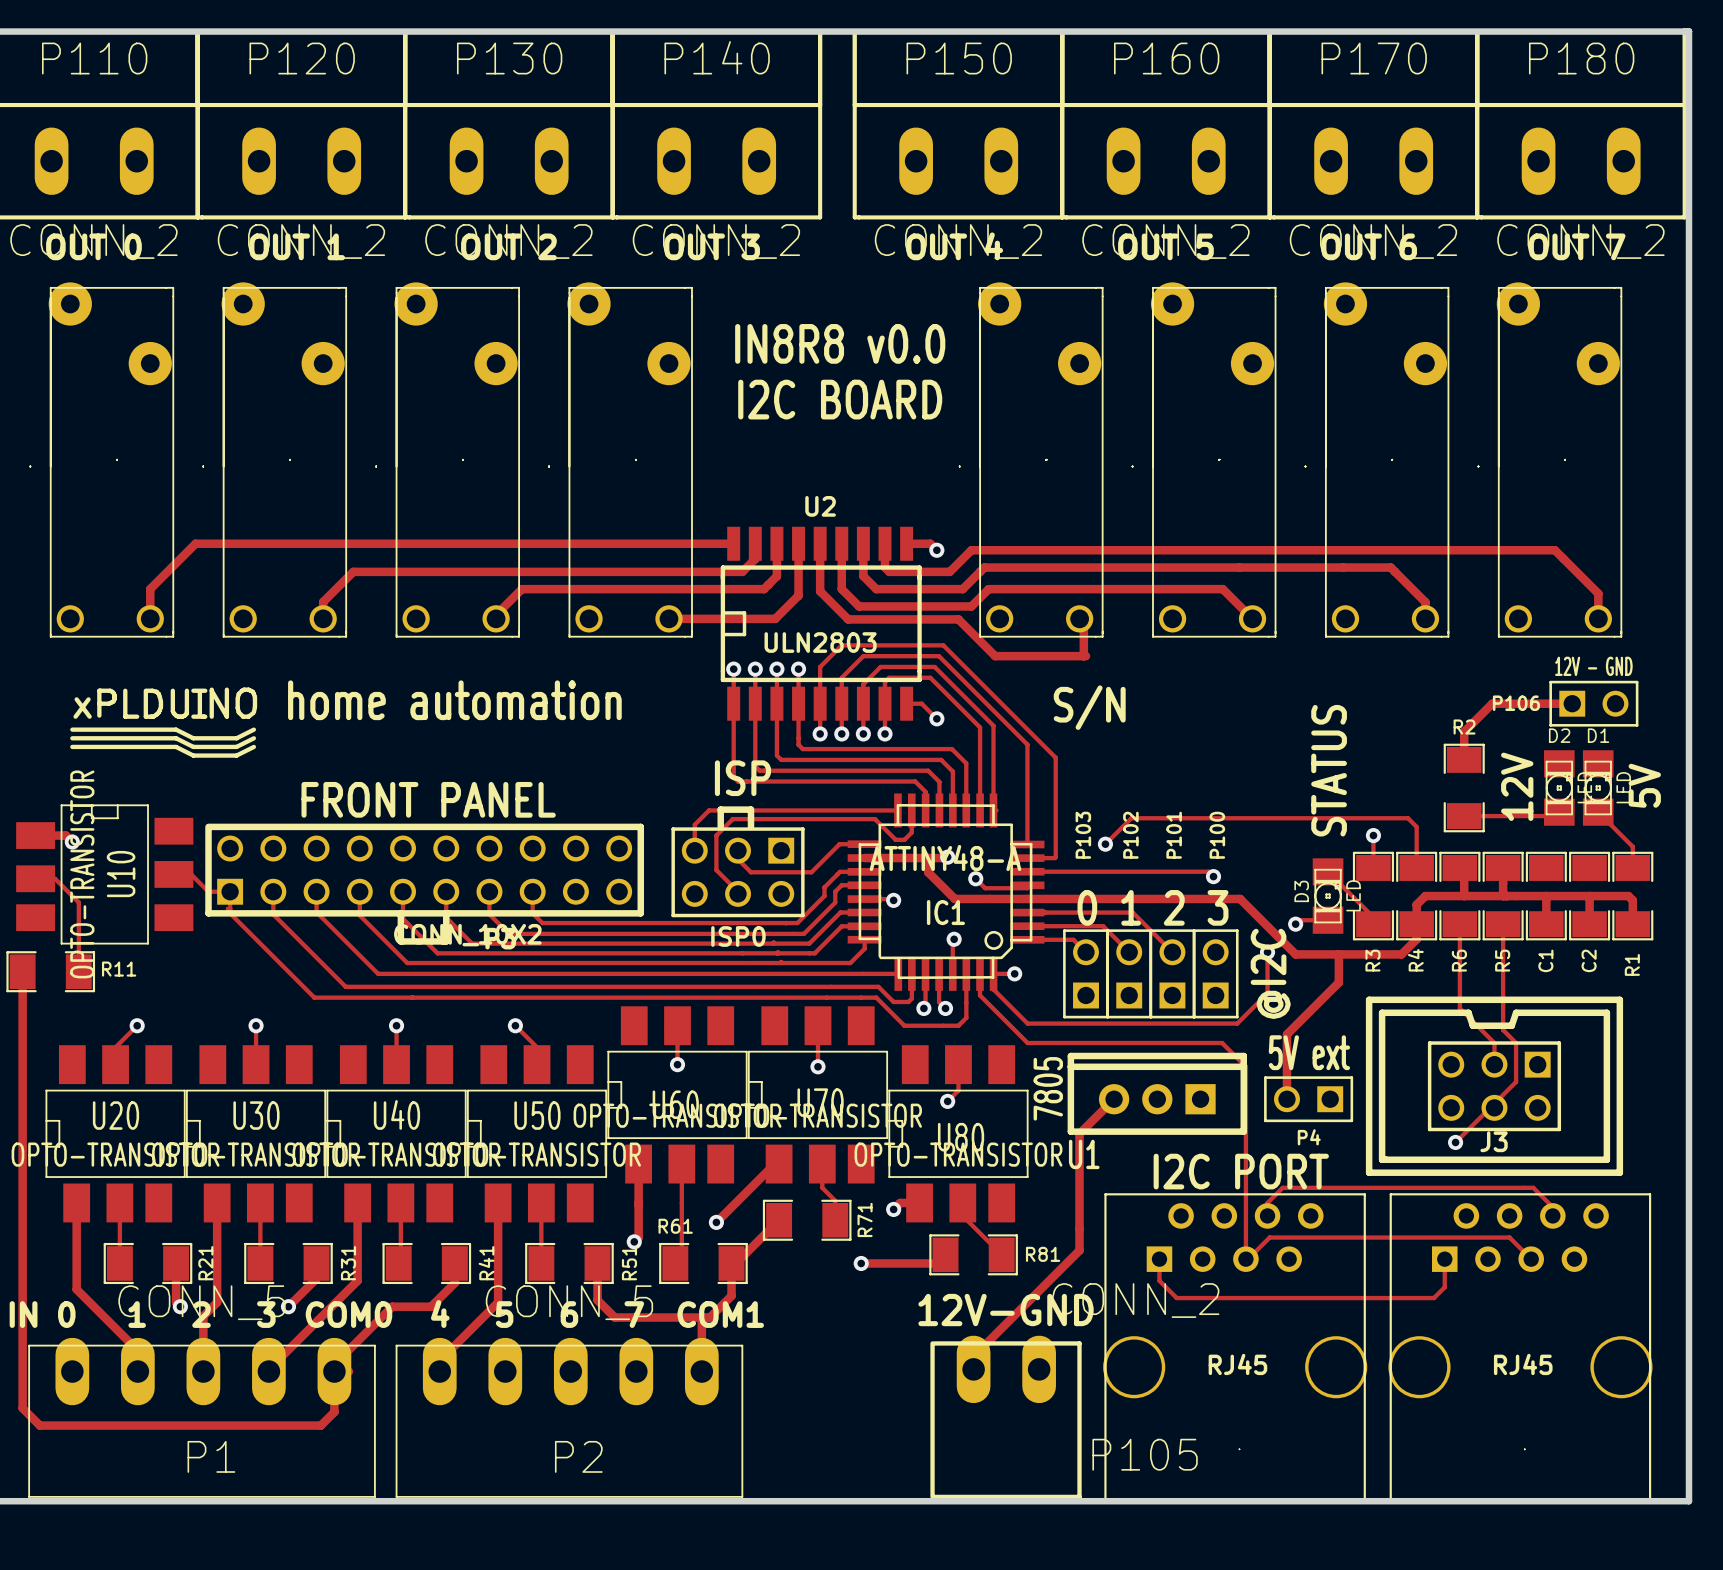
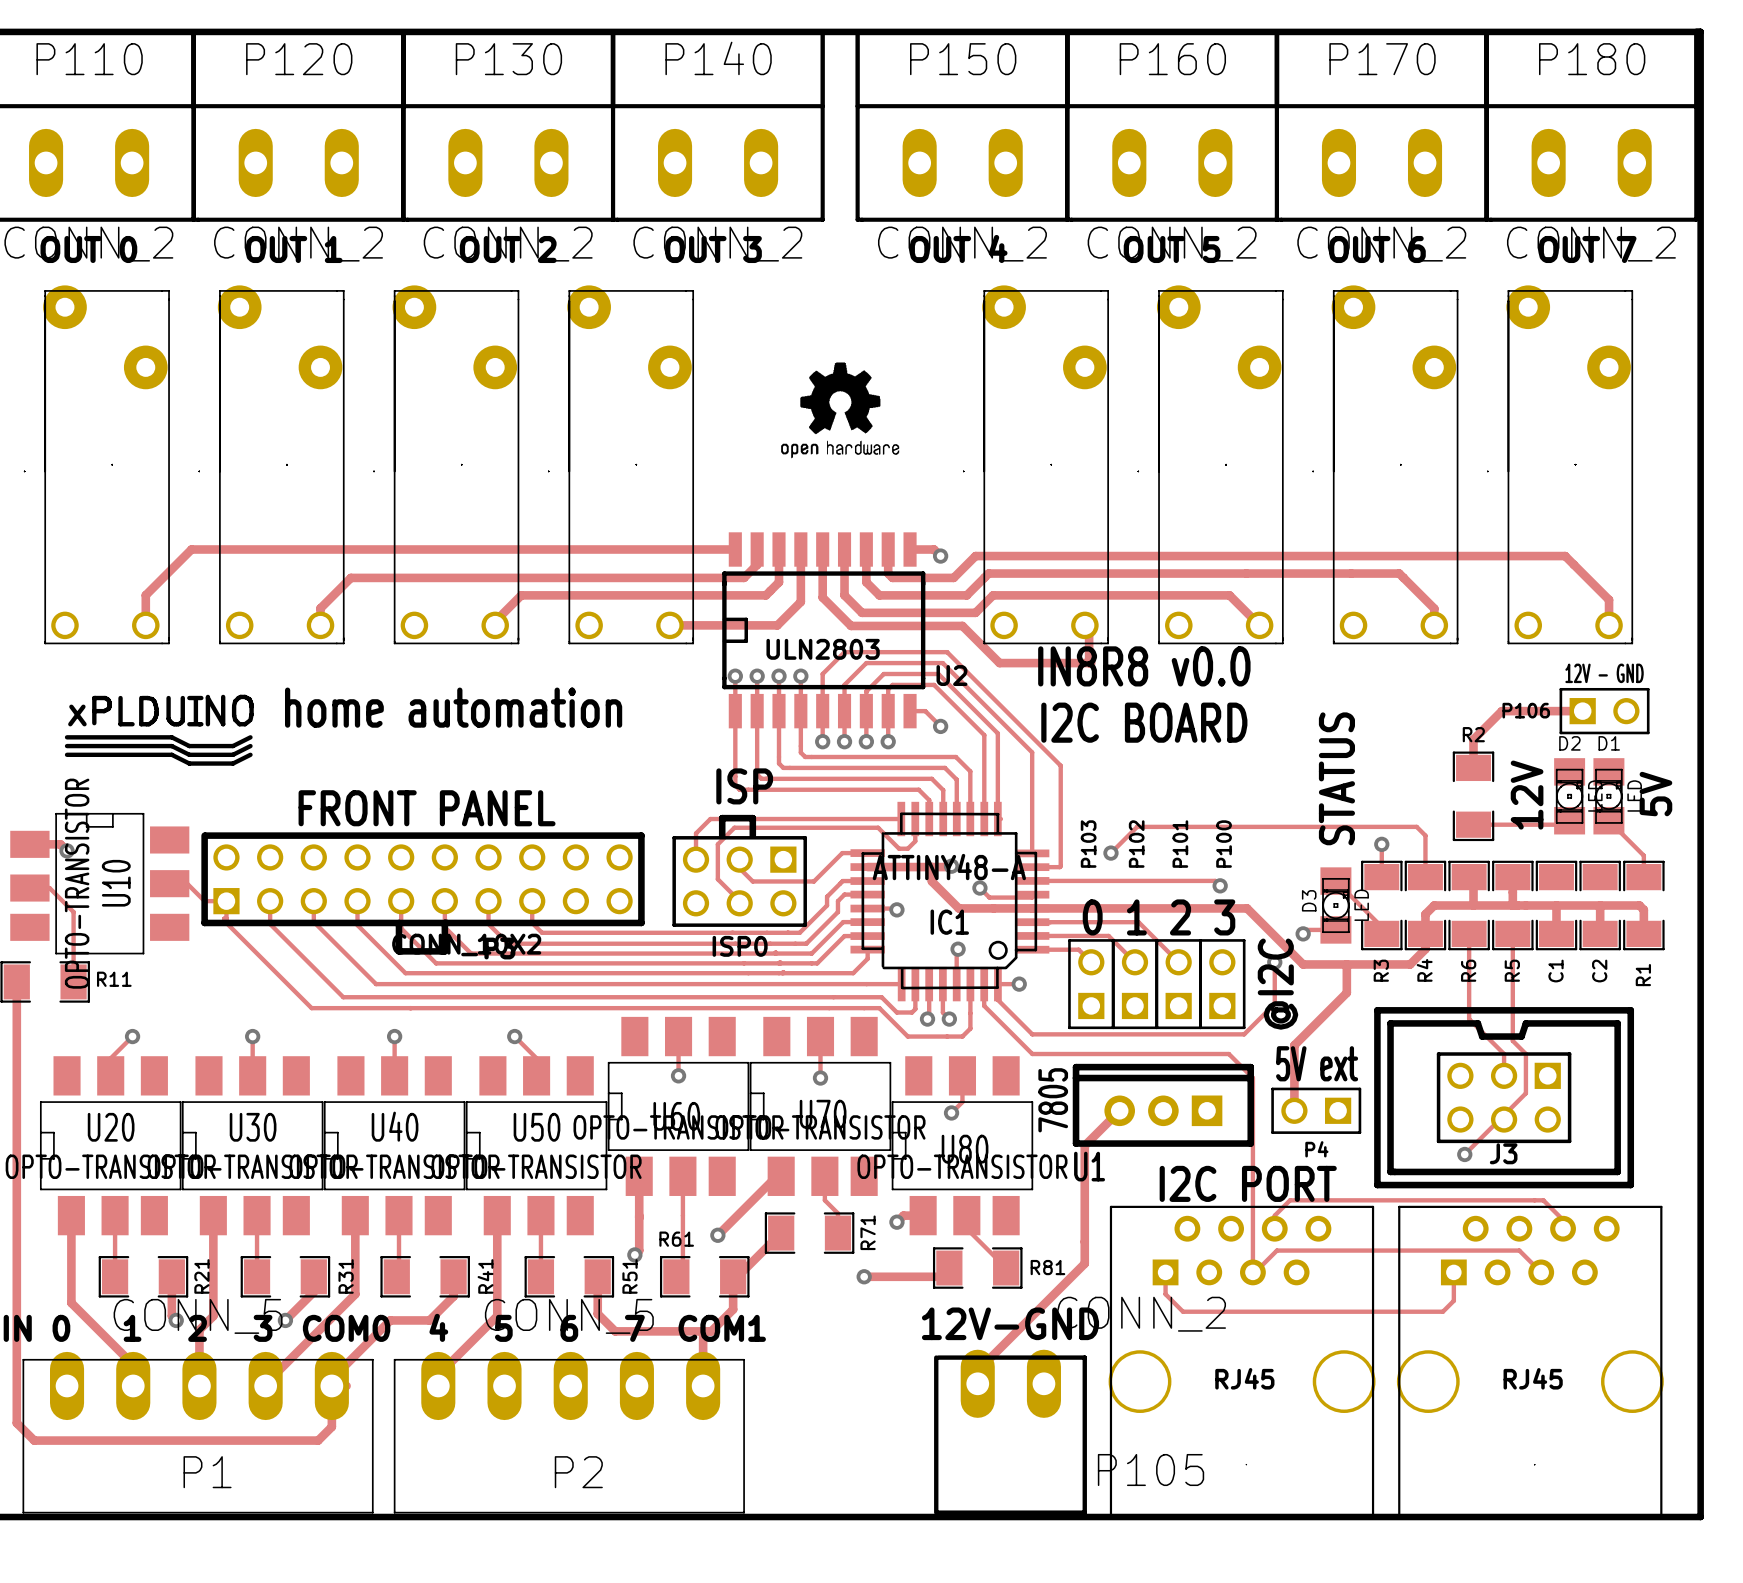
text: IN8R8 v0.0 (840, 343) -> none
drawing: none -> [781, 362, 900, 459]
text: I2C BOARD (840, 399) -> none
U2 name position: U2 (820, 506) -> U2 (951, 675)
text: none -> IN8R8 v0.0 (1144, 666)
text: S/N (1089, 707) -> none
text: none -> I2C BOARD (1144, 722)

